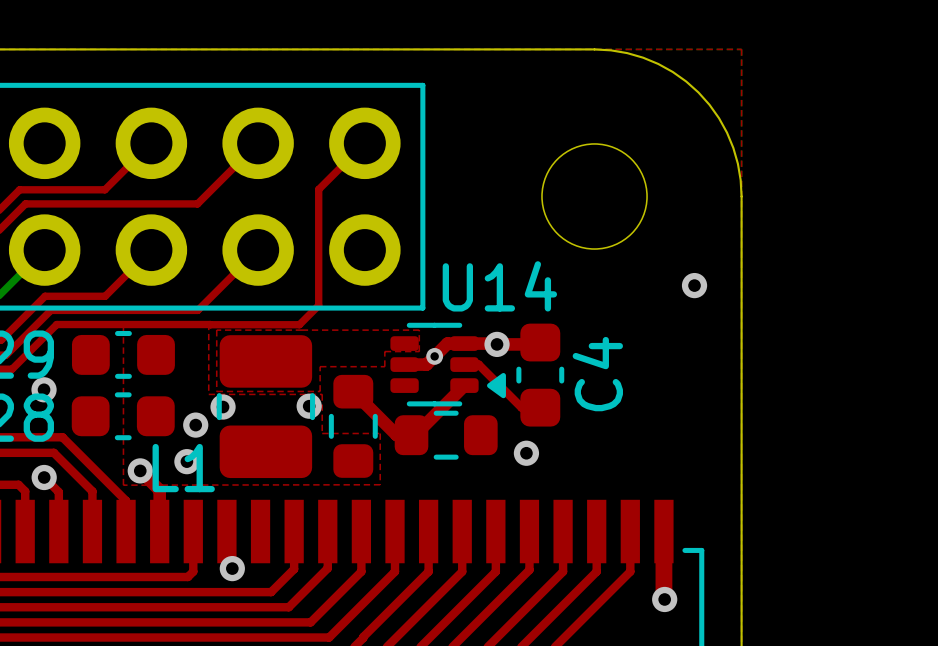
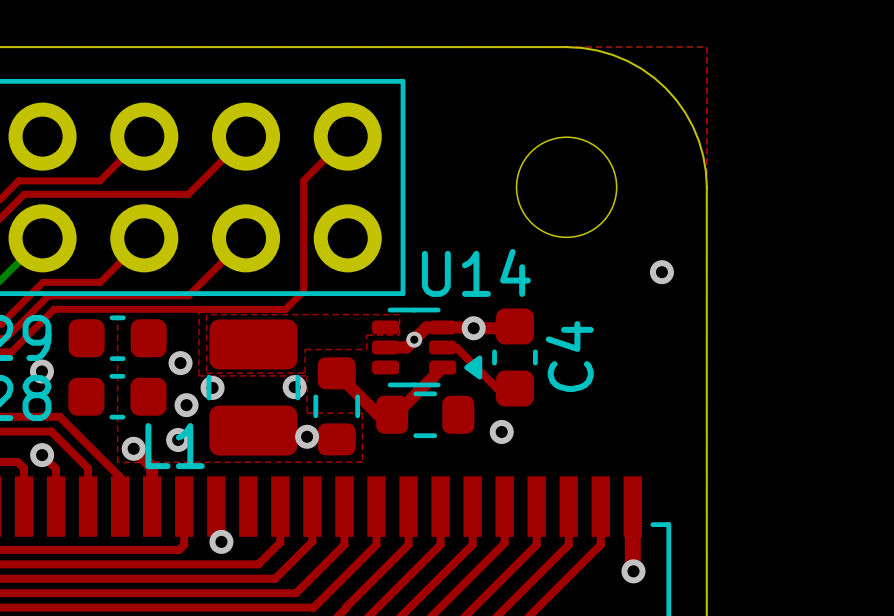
via: none -> (180, 363)
via: none -> (307, 436)

